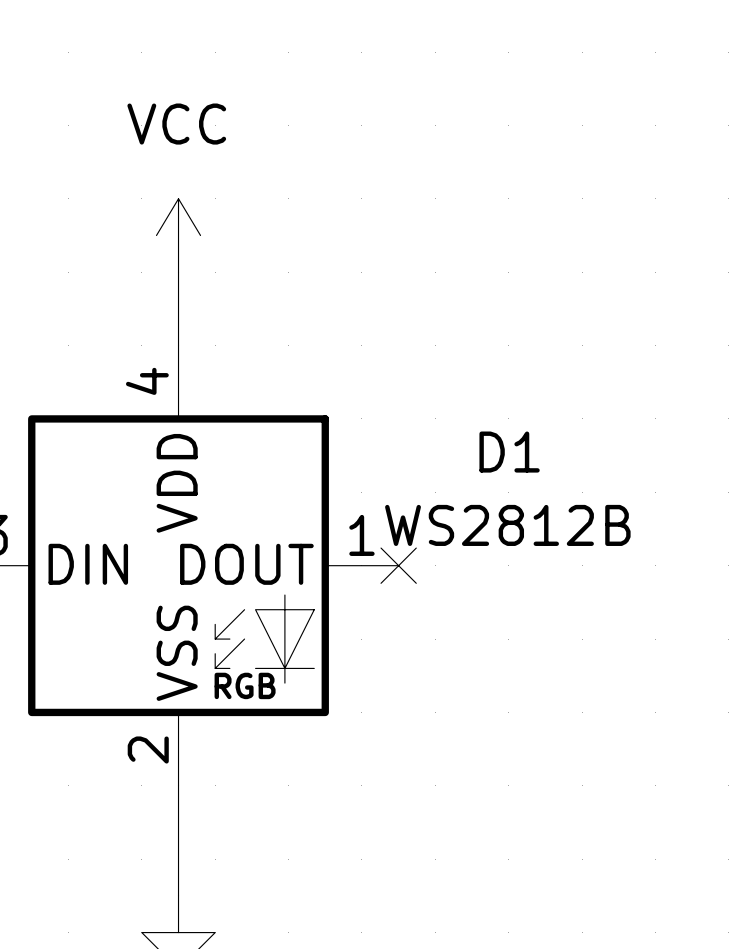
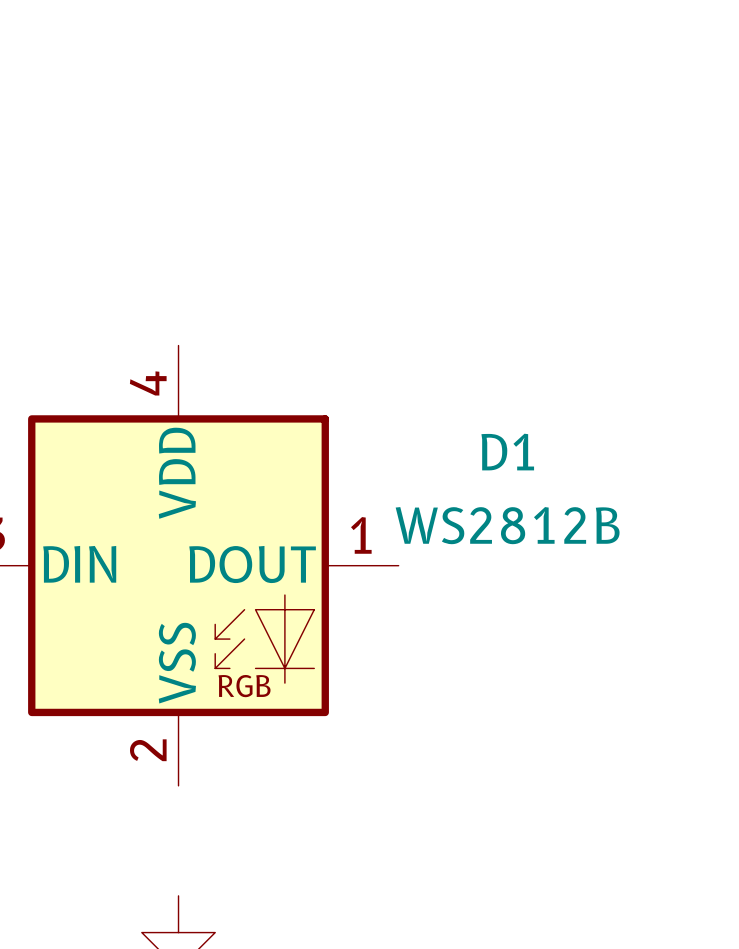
power symbol: VCC (178, 235) -> none
wire: (178, 272) (178, 345) -> none
no-connect mark: (398, 565) -> none
wire: (178, 785) (178, 895) -> none

